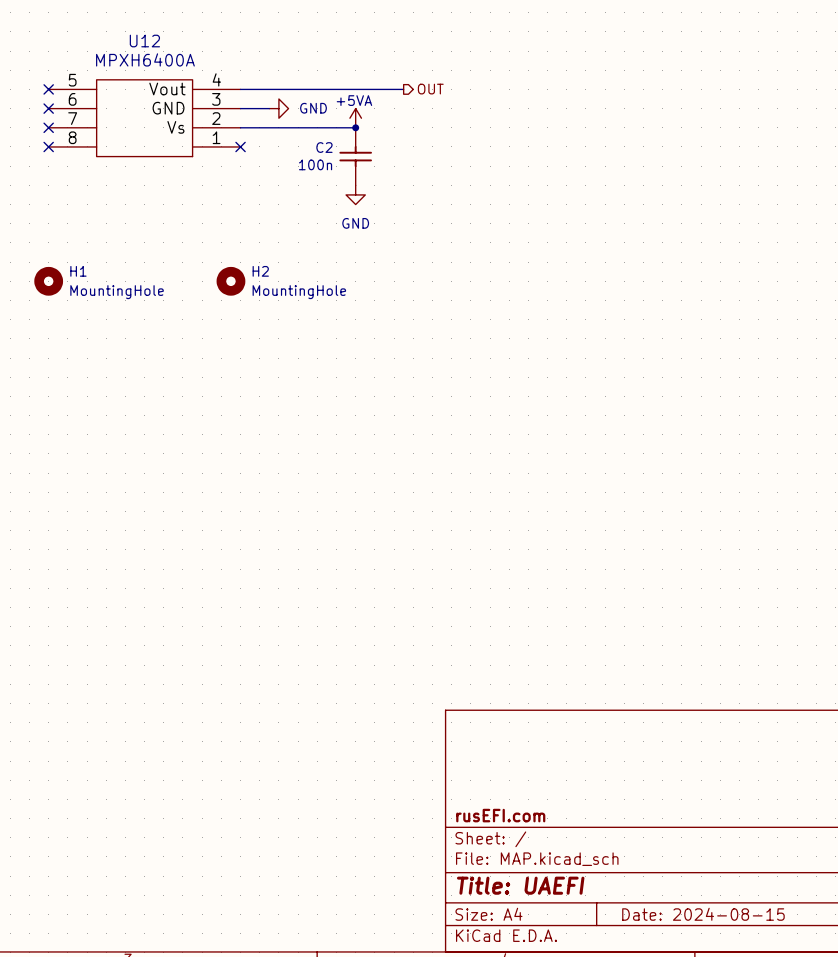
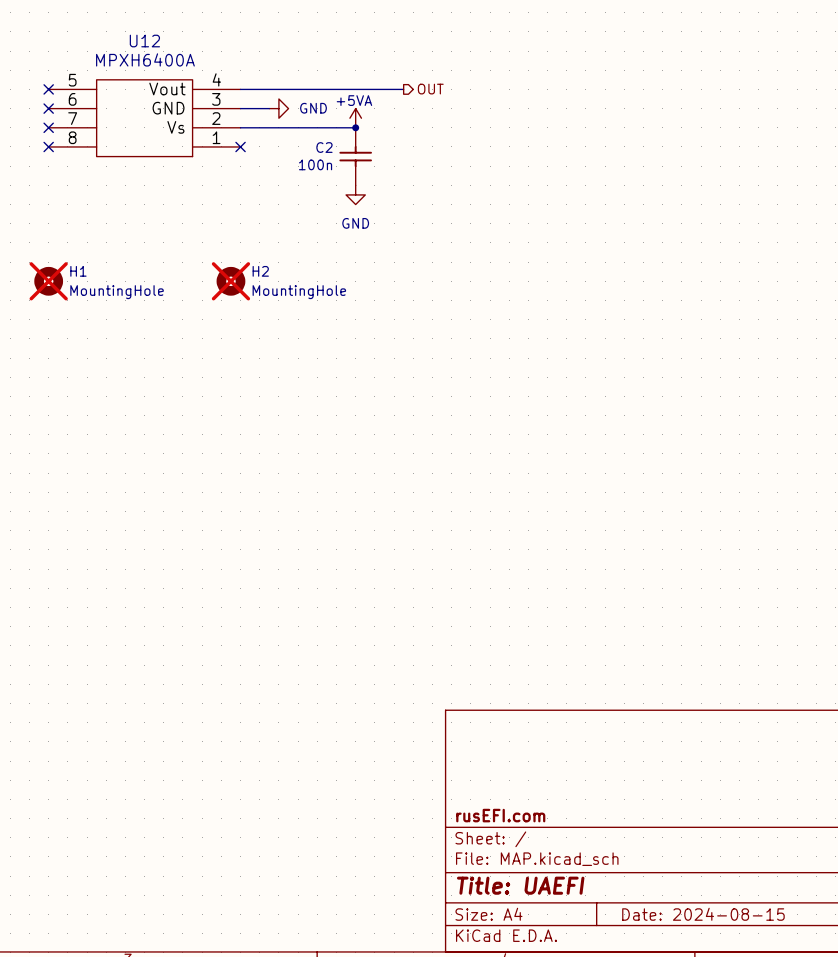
H1 do-not-place cross: none -> (48, 281)
H2 do-not-place cross: none -> (230, 281)

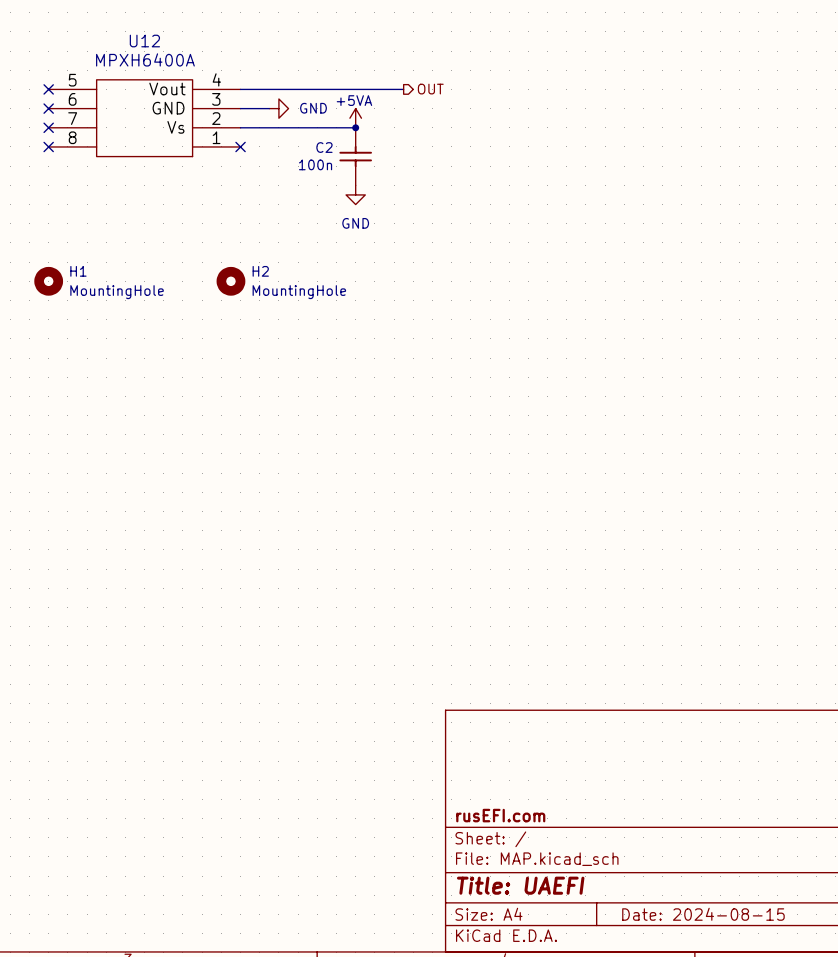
H1 do-not-place cross: (48, 281) -> none
H2 do-not-place cross: (230, 281) -> none

